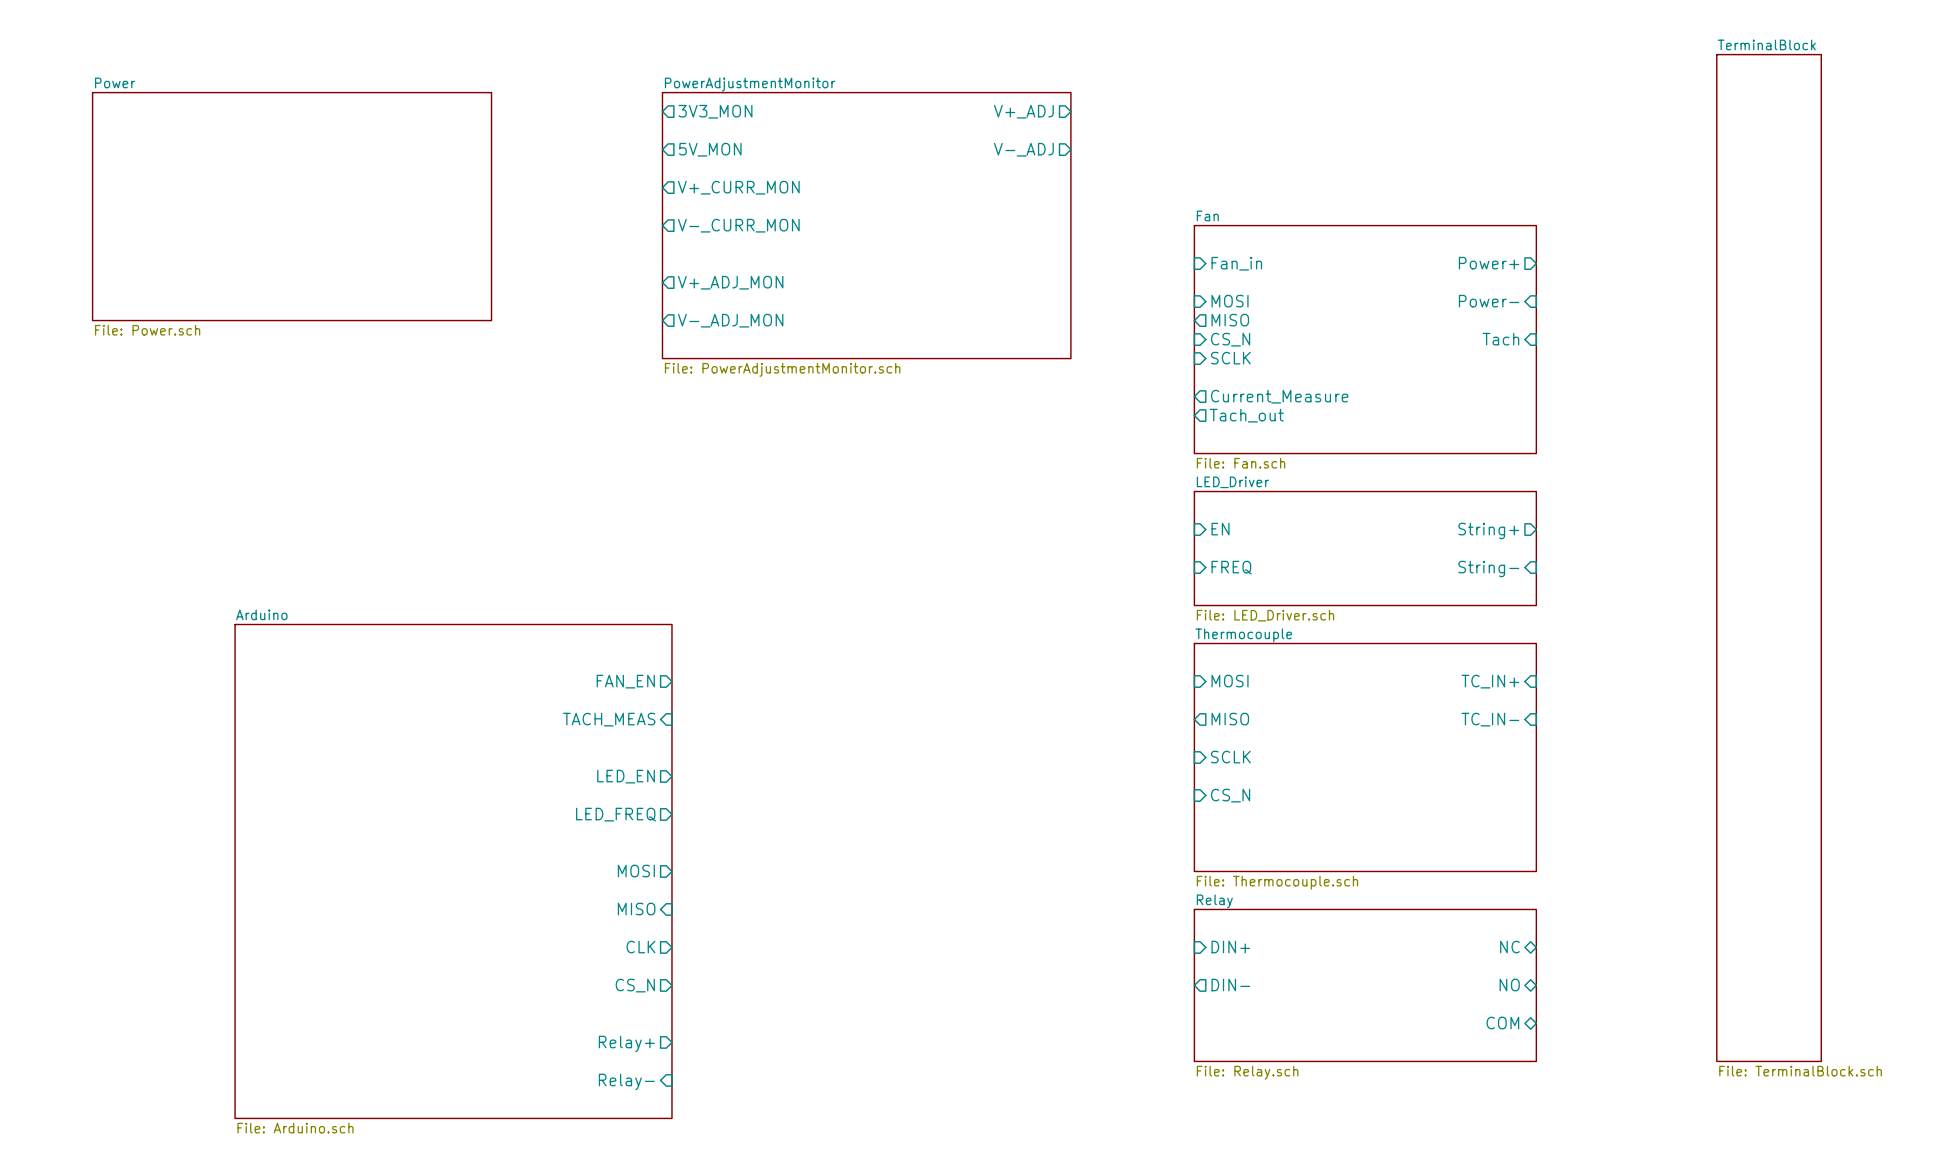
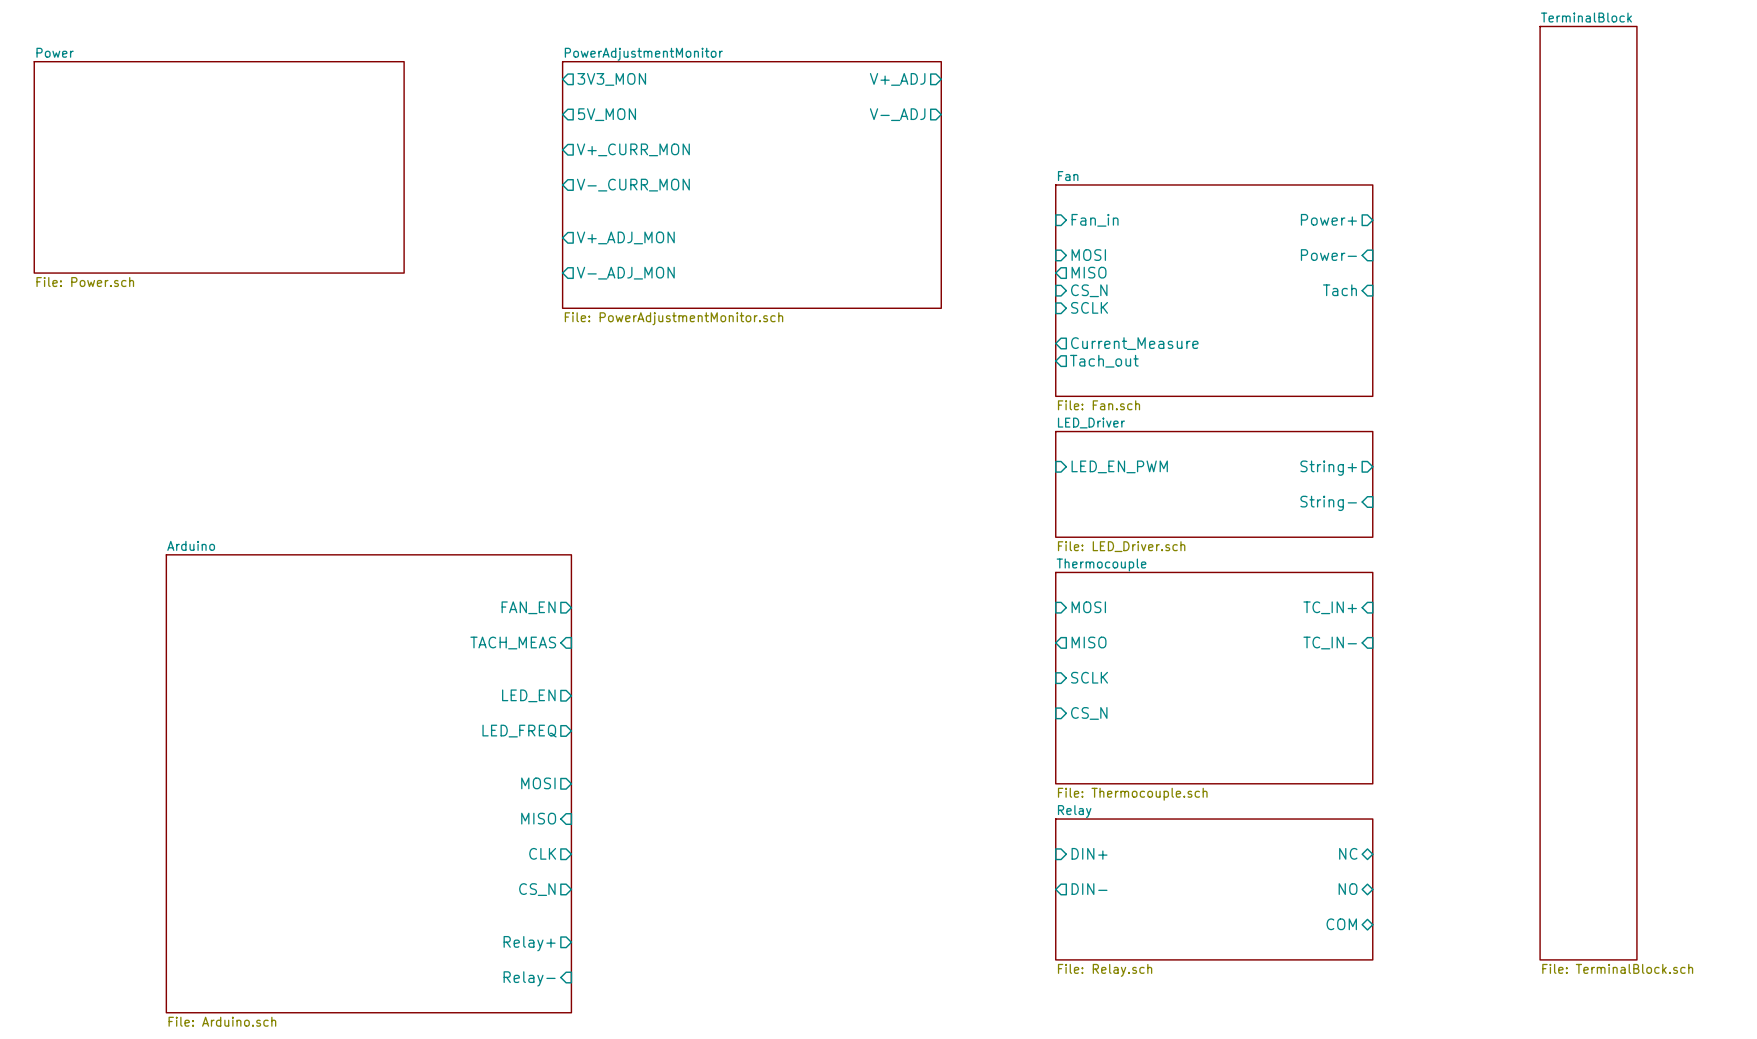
sheet pin: EN (1220, 529) -> LED_EN_PWM (1119, 466)
sheet pin: FREQ (1231, 567) -> none

